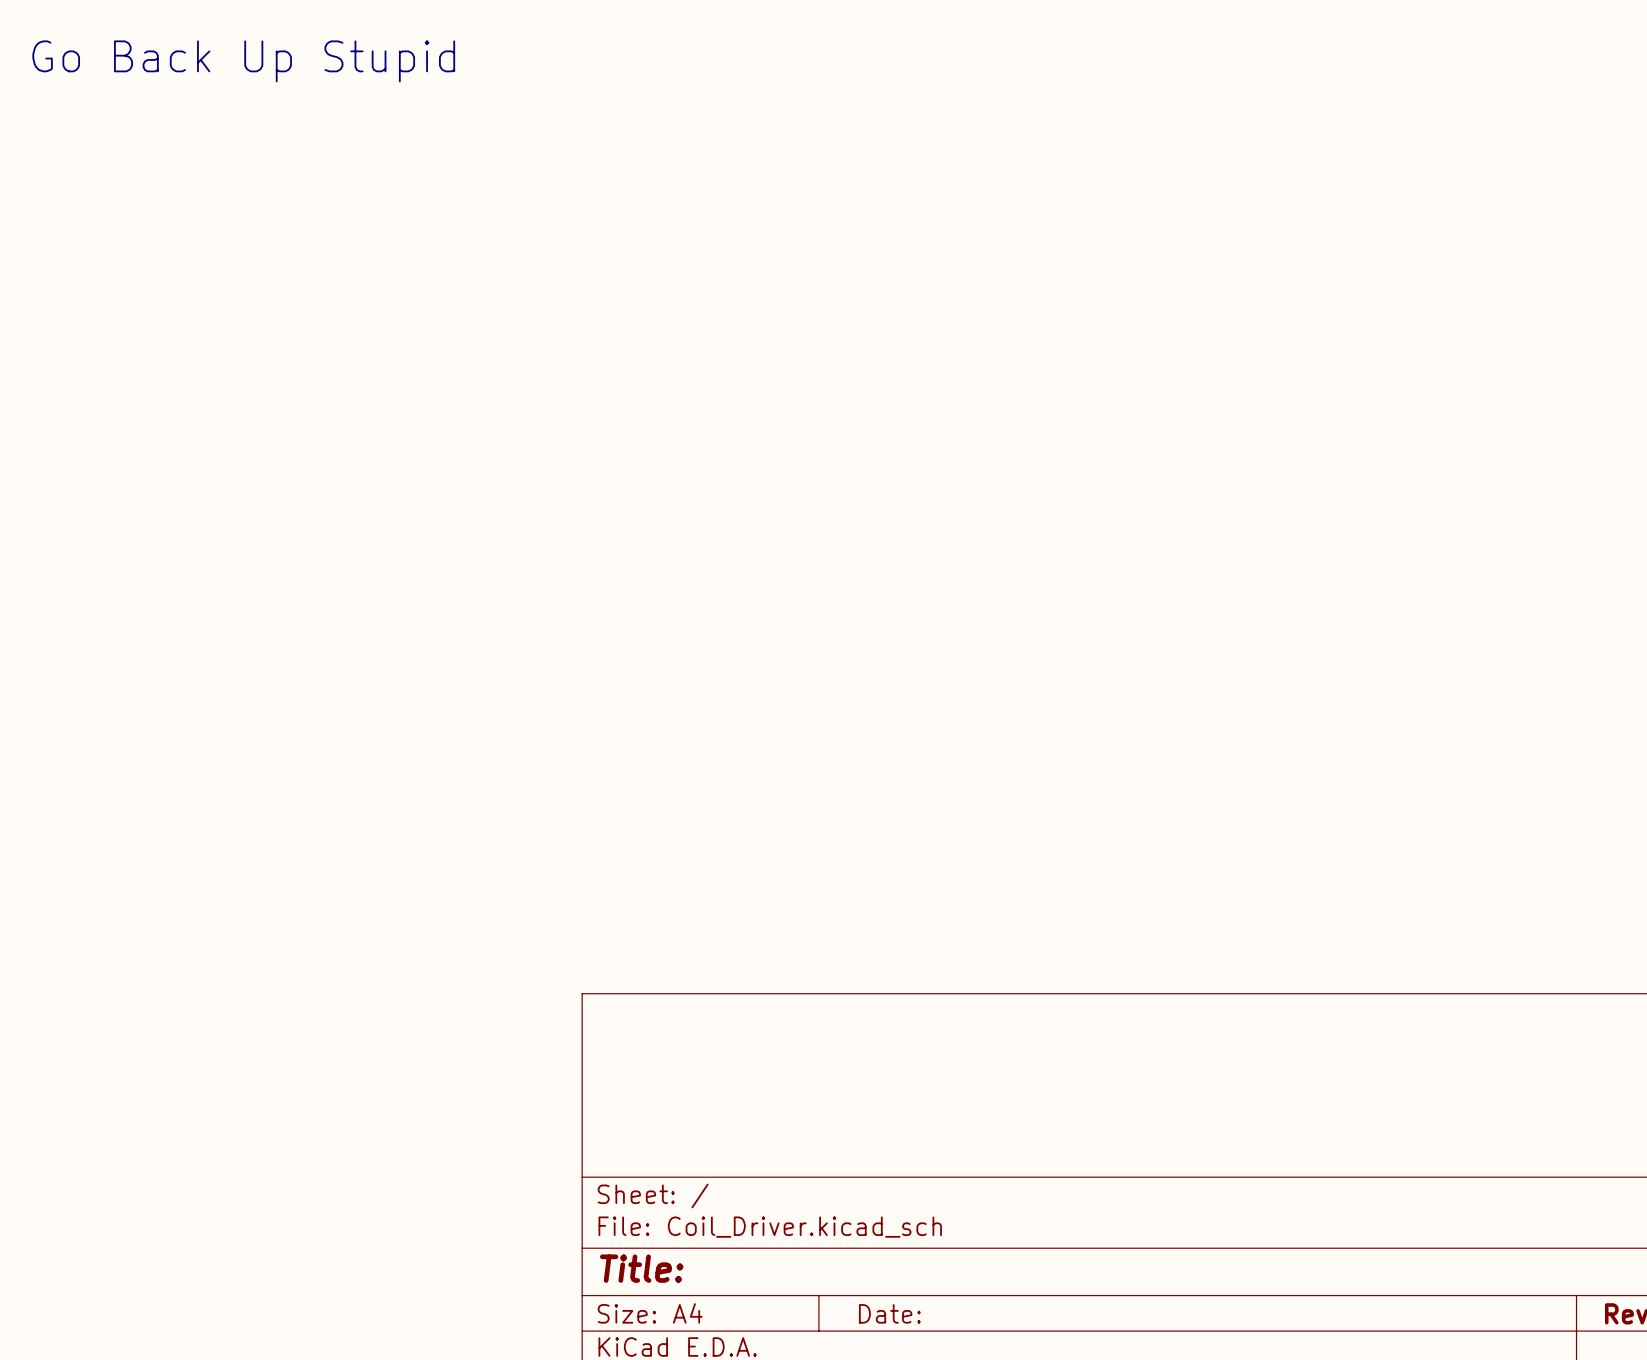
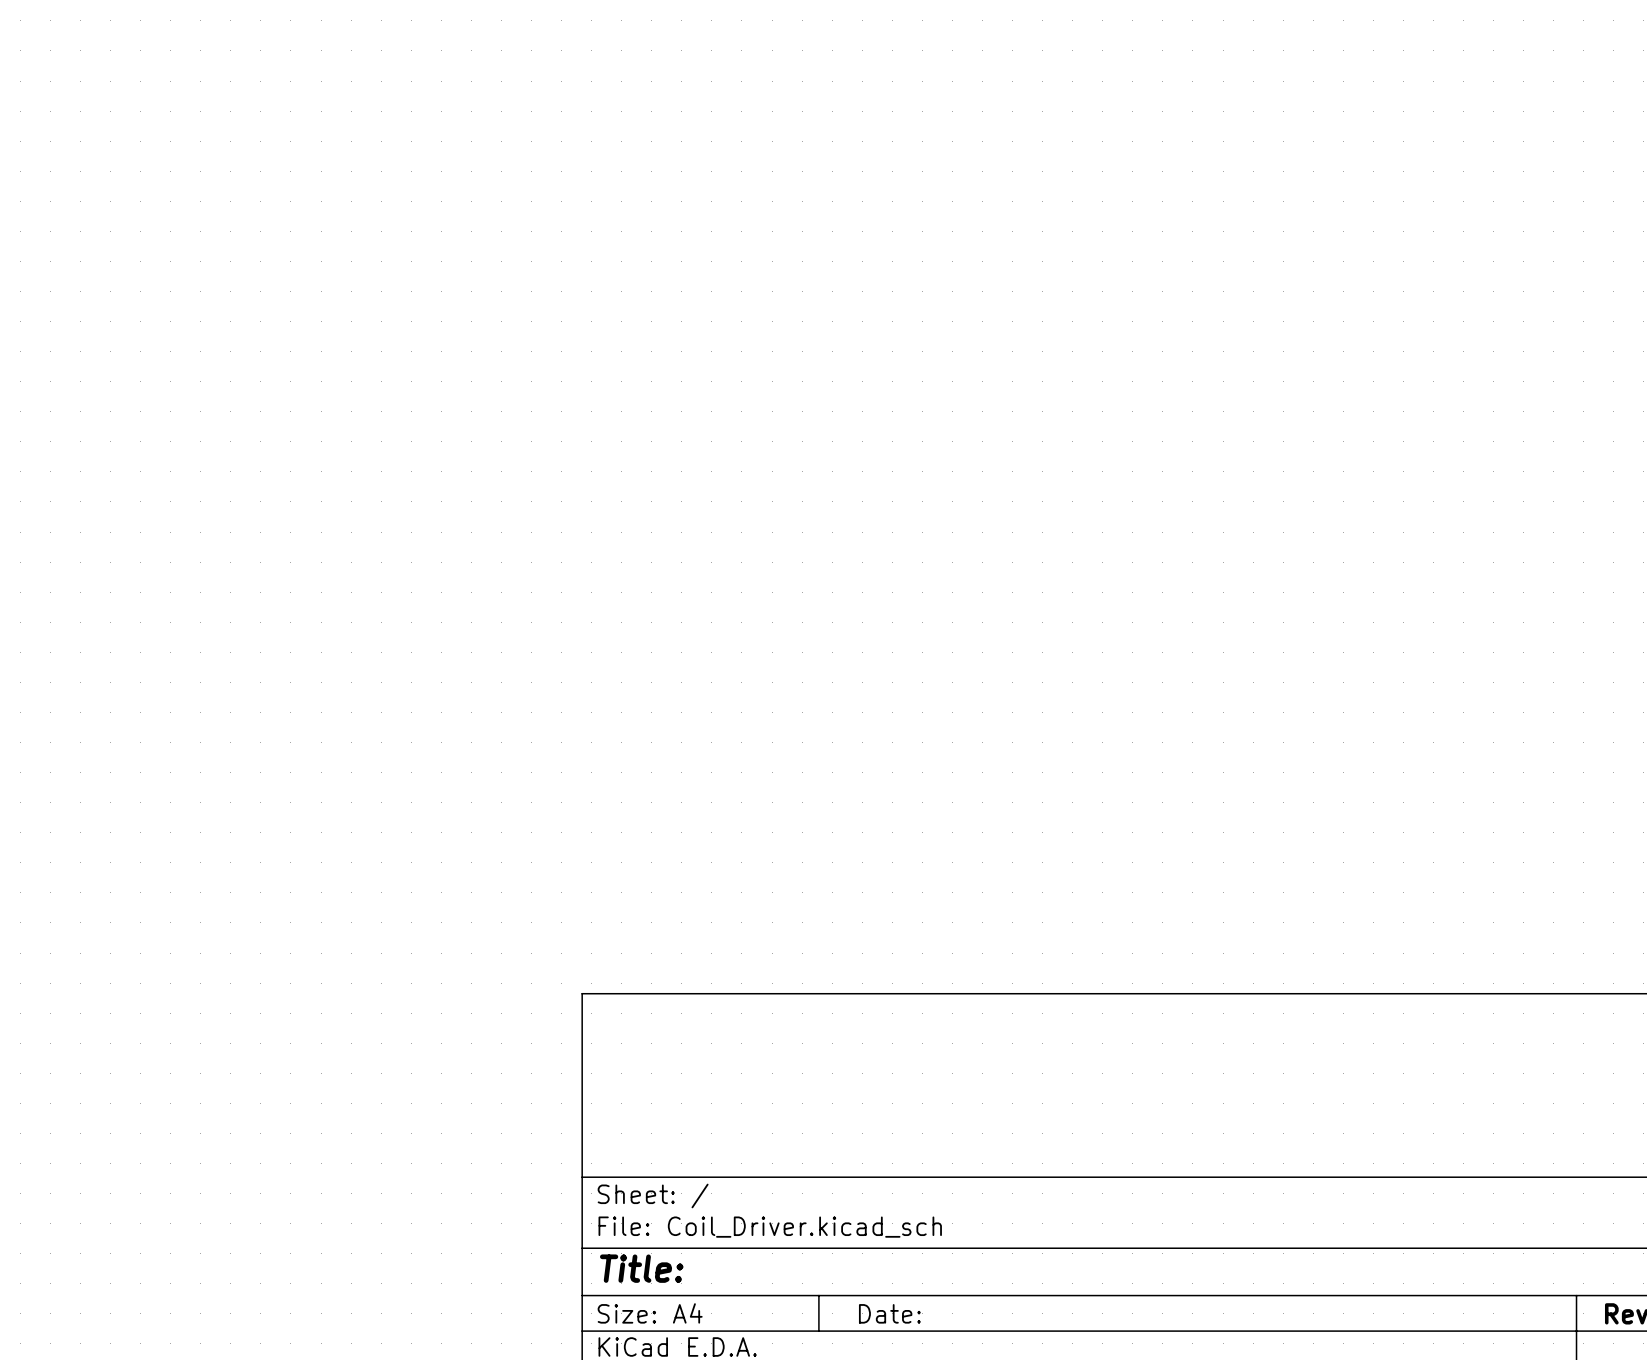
text: Go Back Up Stupid (243, 61) -> none

